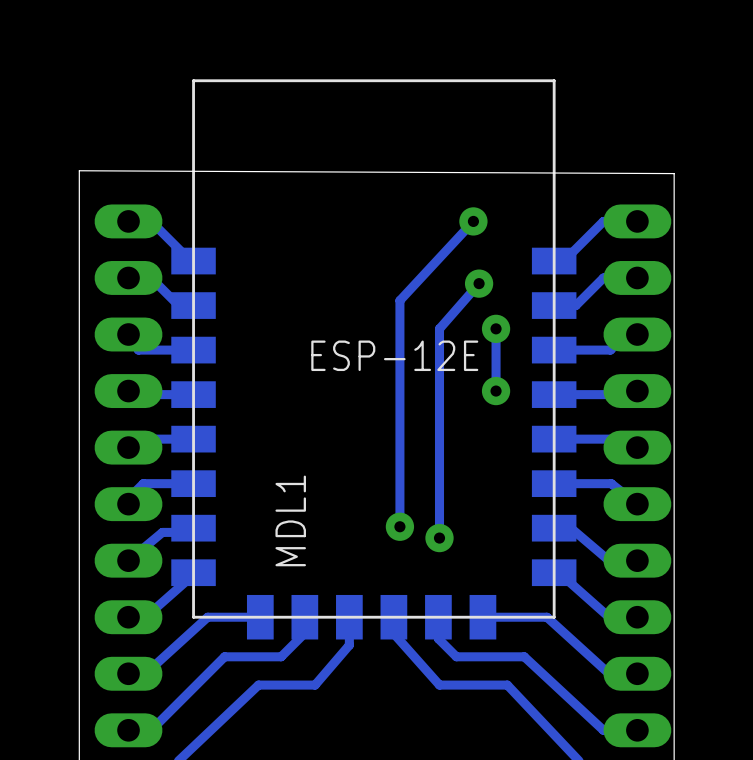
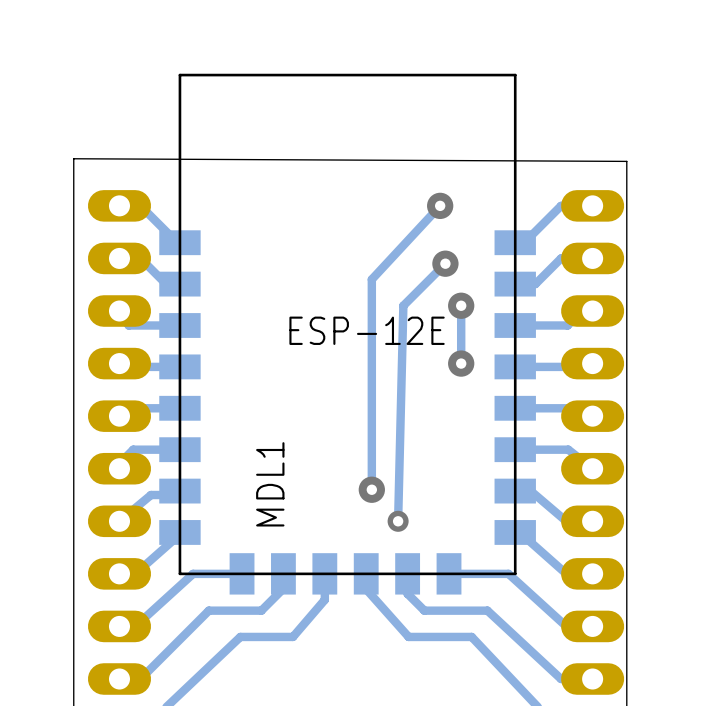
track: (479, 283) (439, 328) (439, 538) -> (445, 263) (403, 305) (398, 521)
via: (439, 538) -> none
via: none -> (398, 521)

